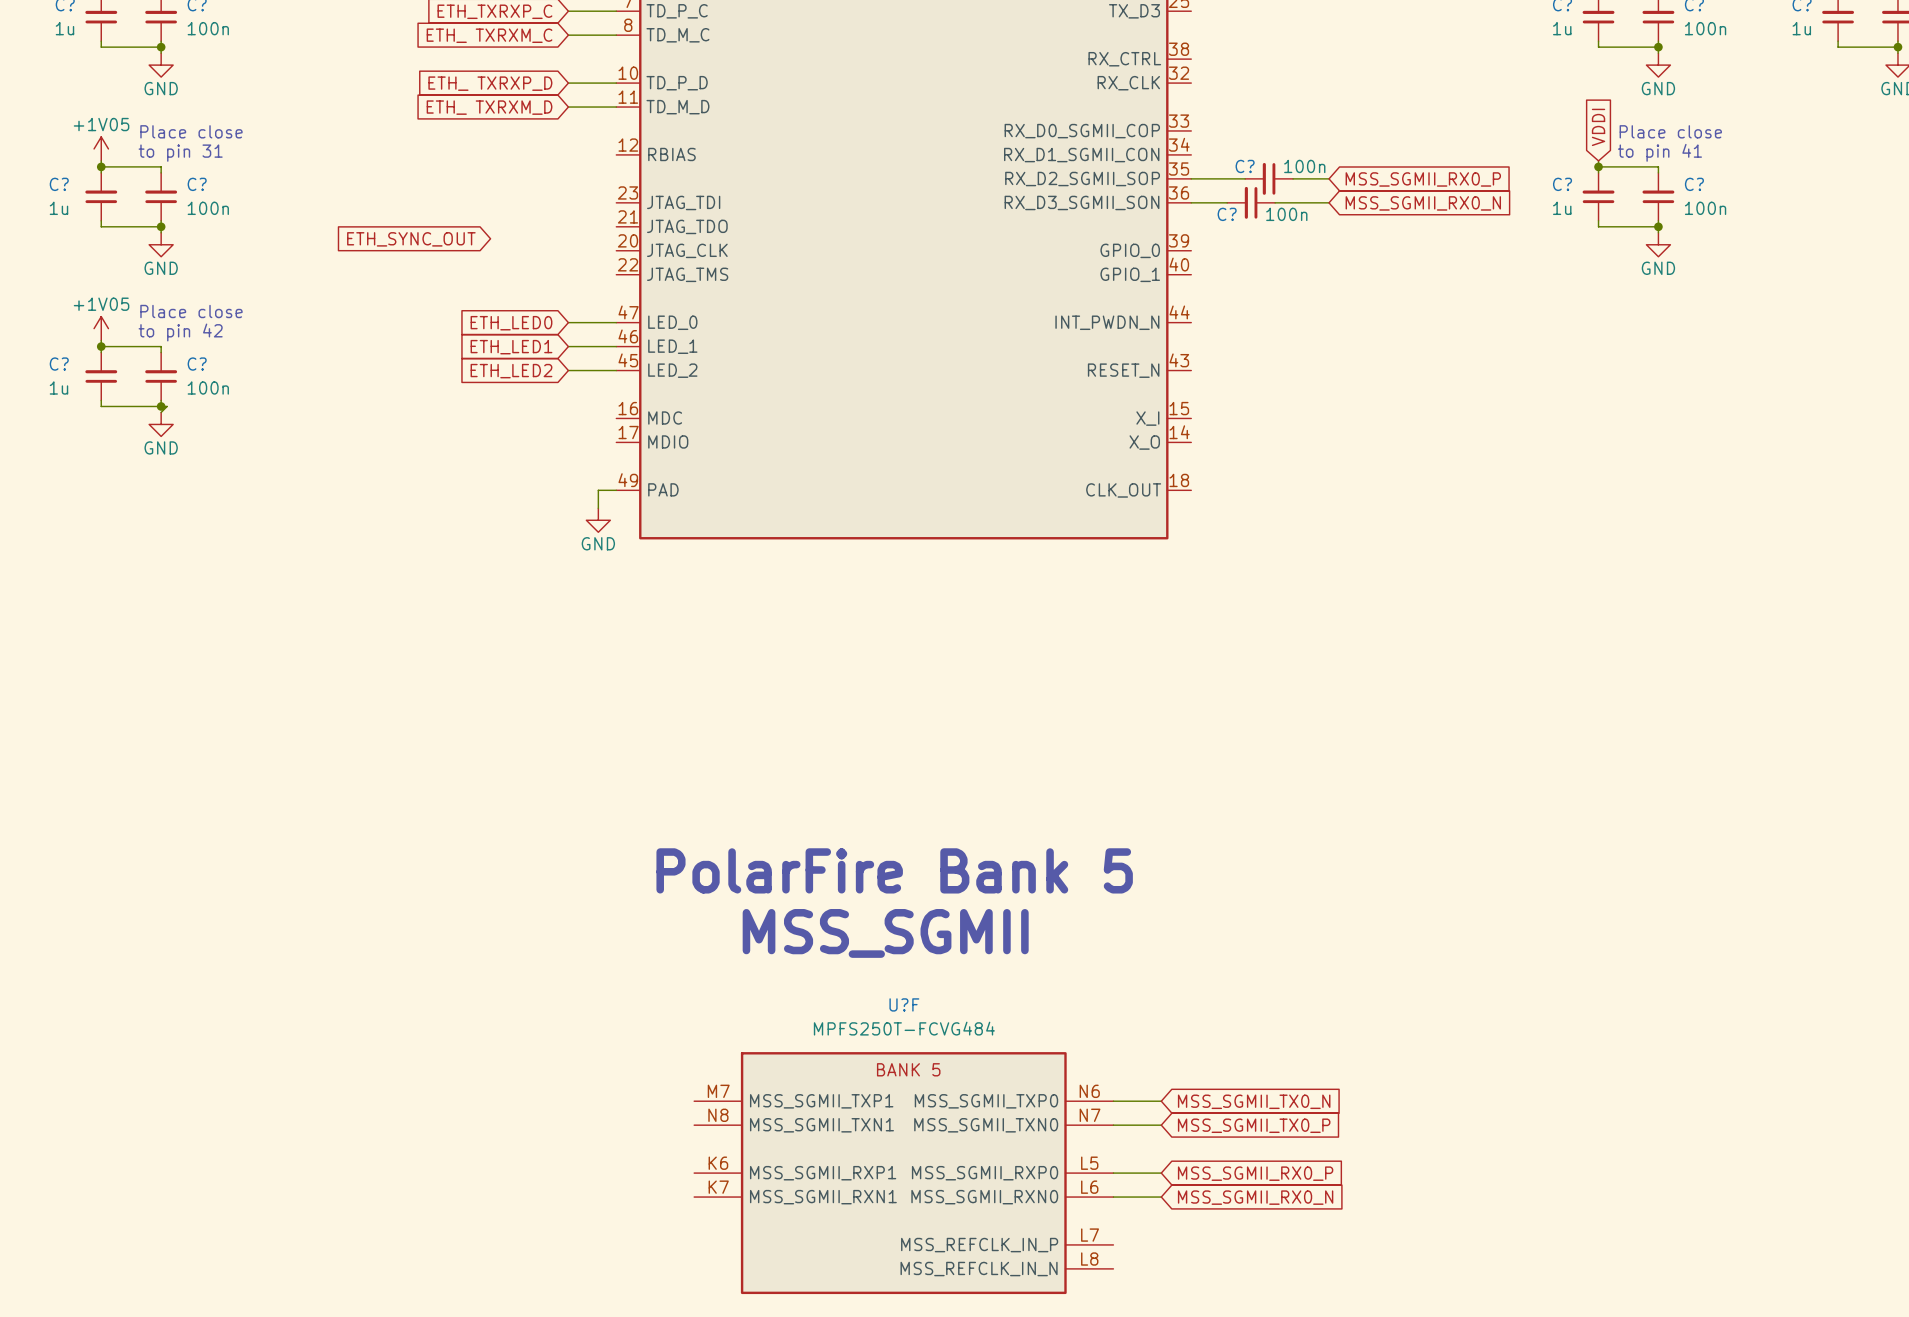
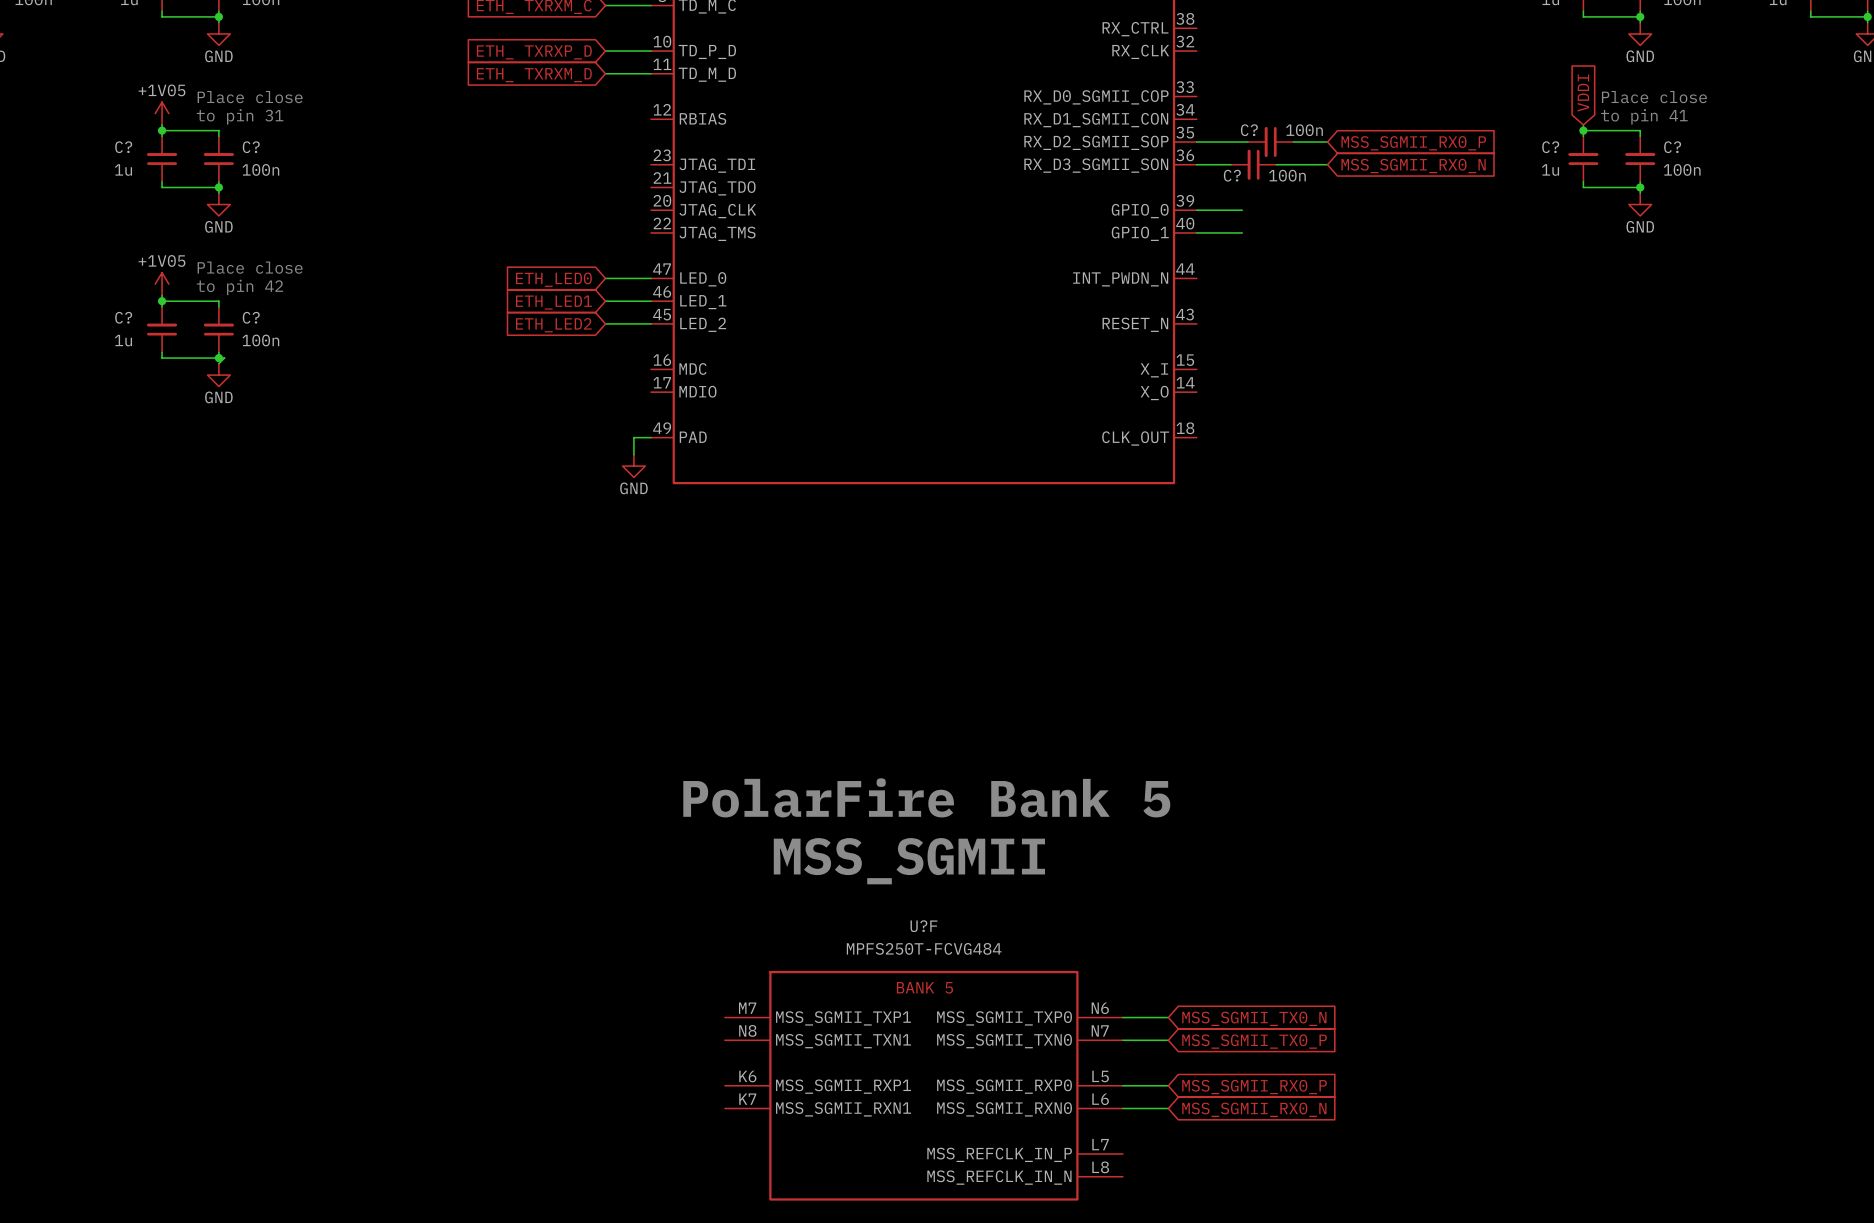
global label: ETH_SYNC_OUT (411, 239) -> none
wire: none -> (1196, 210) (1242, 210)
wire: none -> (1196, 232) (1242, 232)

